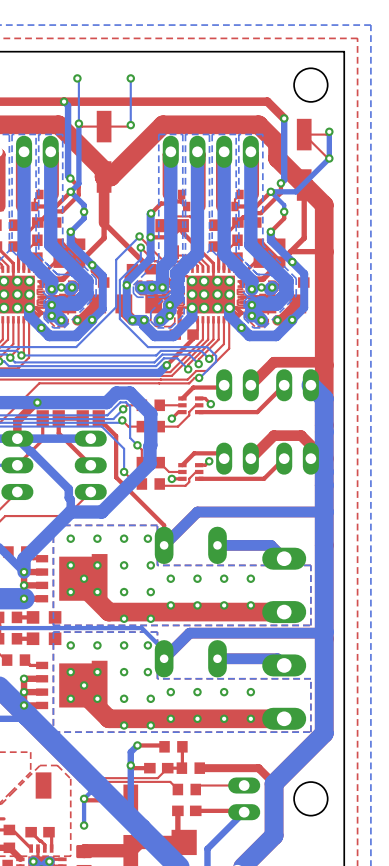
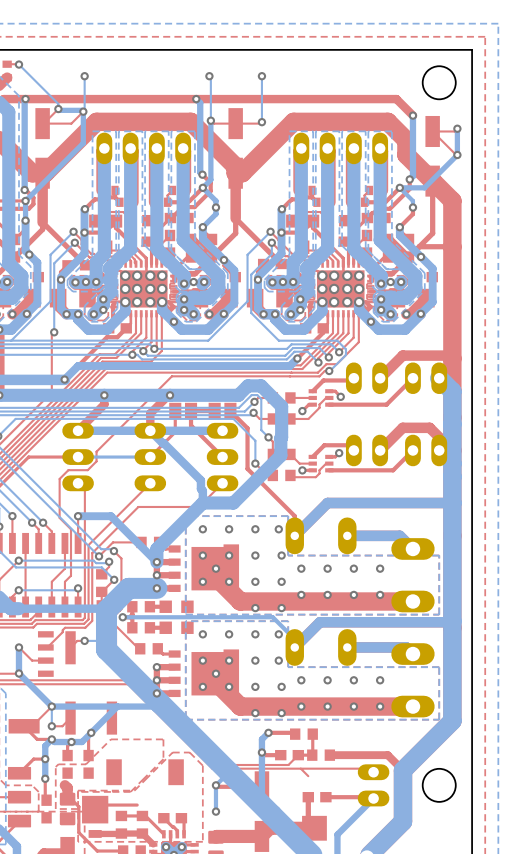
top track: (244, 785) (199, 785) (195, 789) -> (373, 772) (370, 768) (300, 768)
part: (186, 789) -> none

